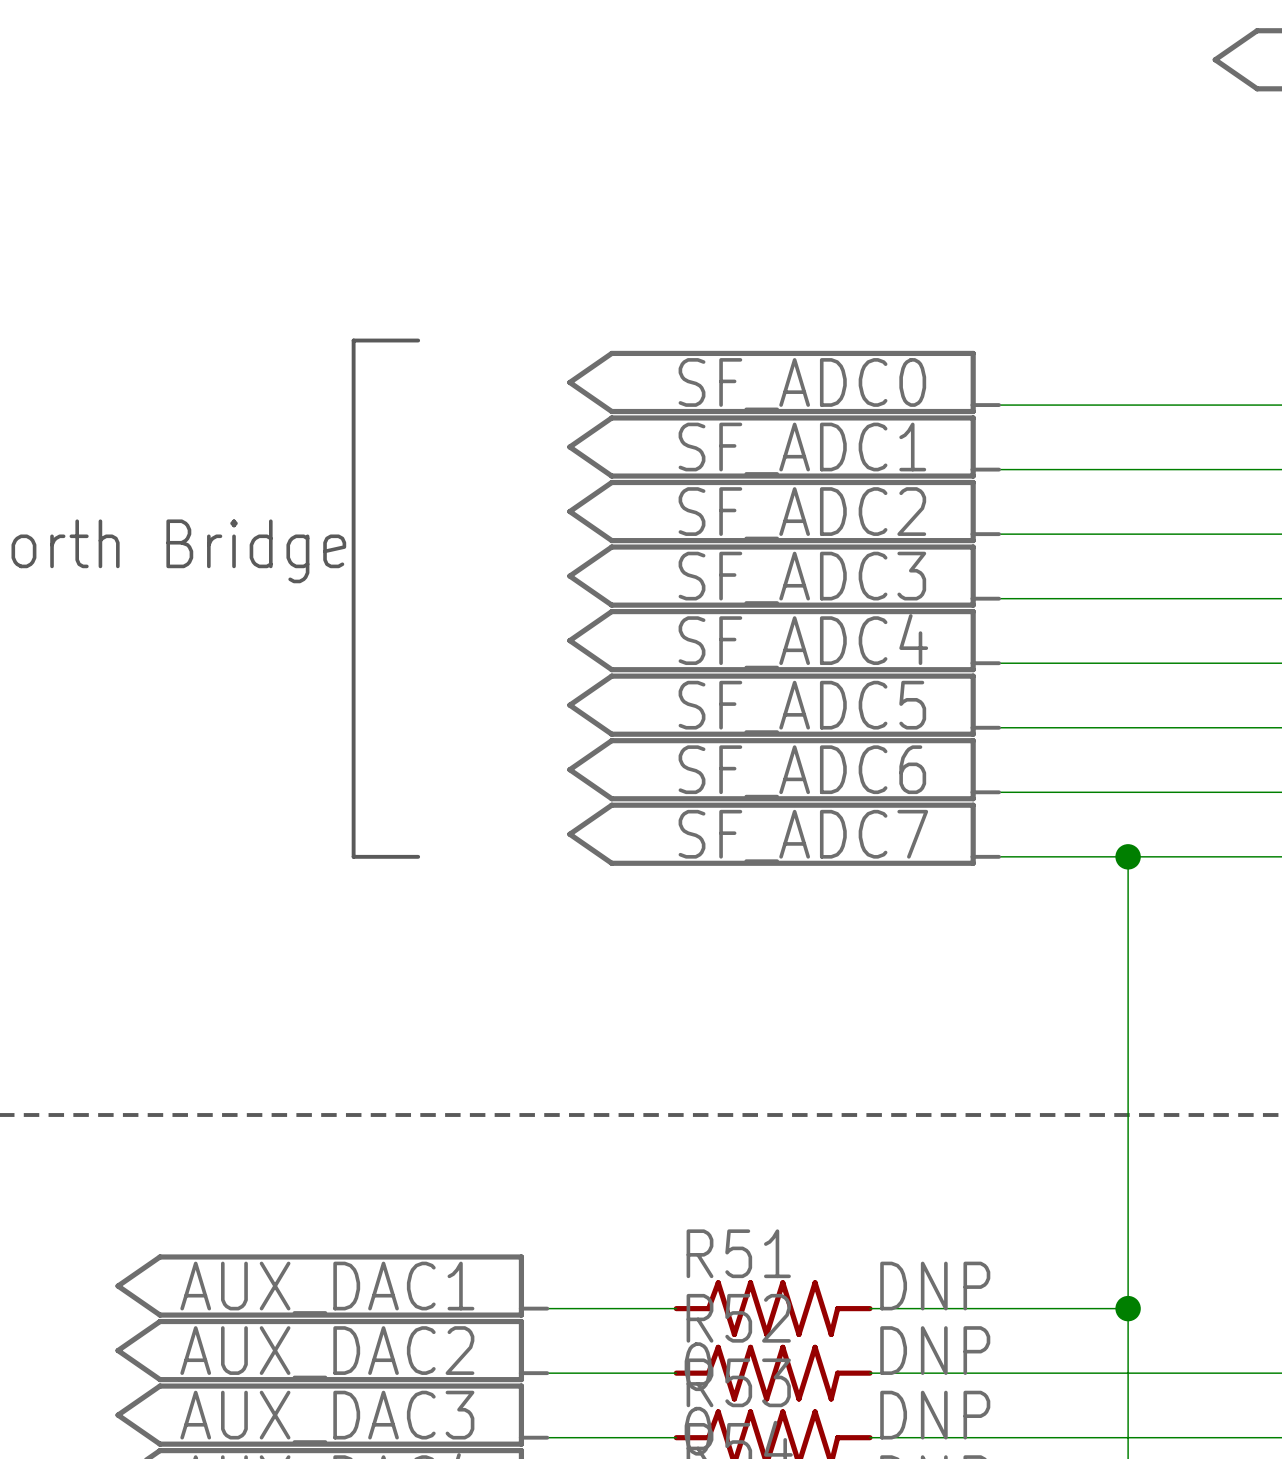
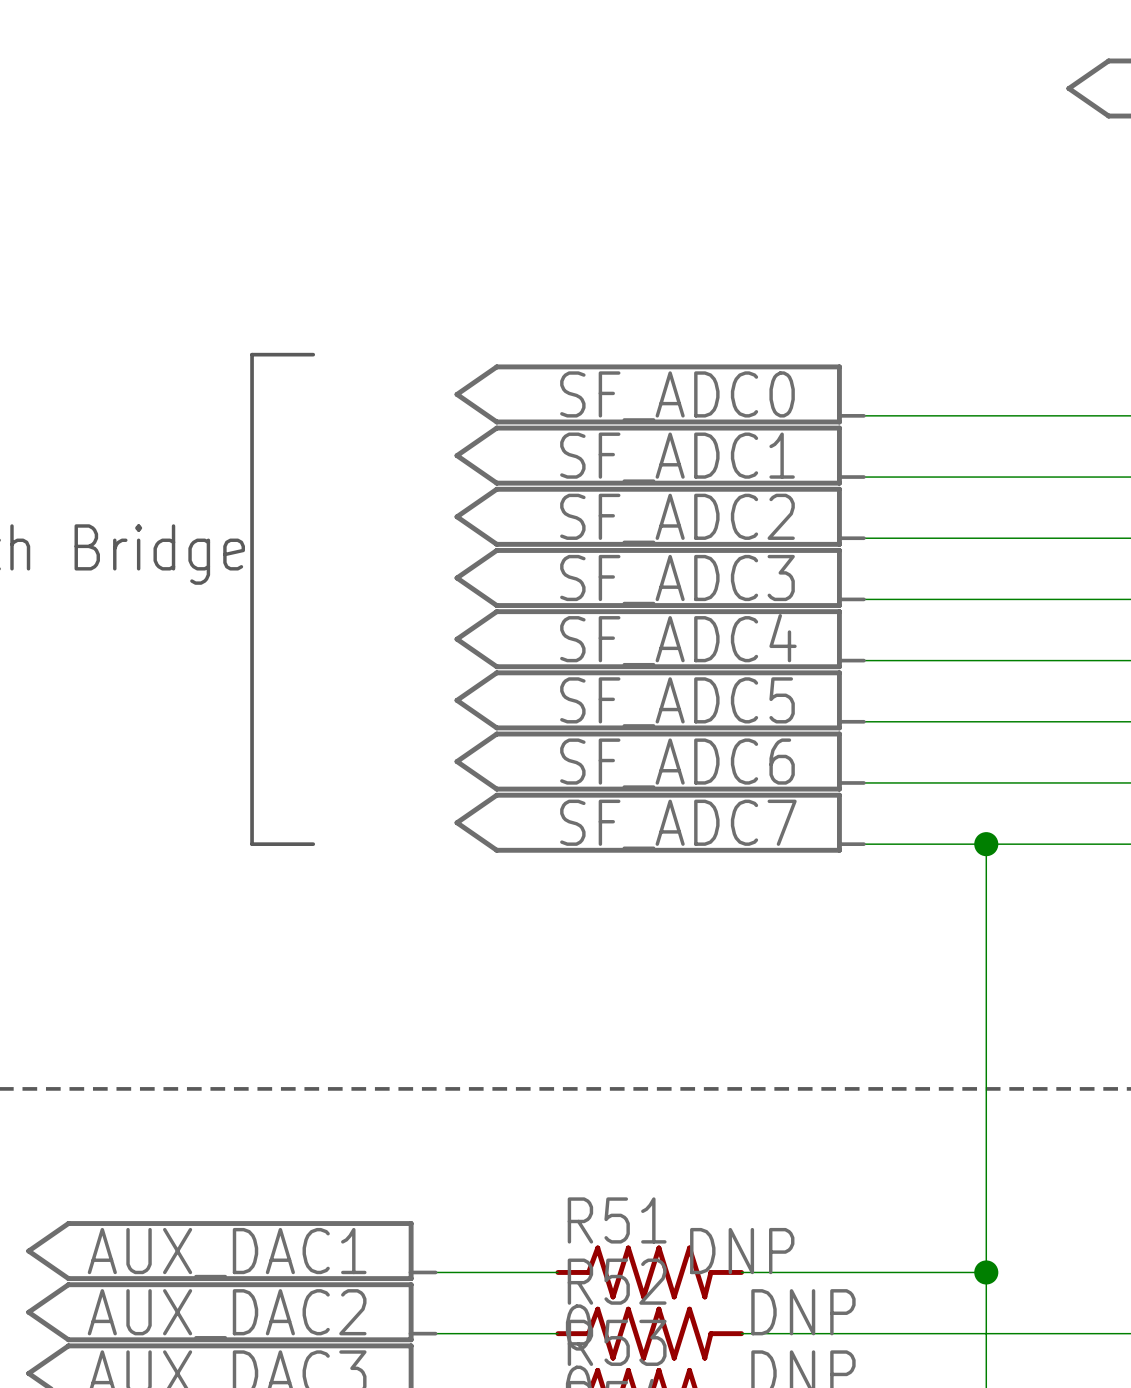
R51 text position: DNP (935, 1286) -> DNP (742, 1251)

